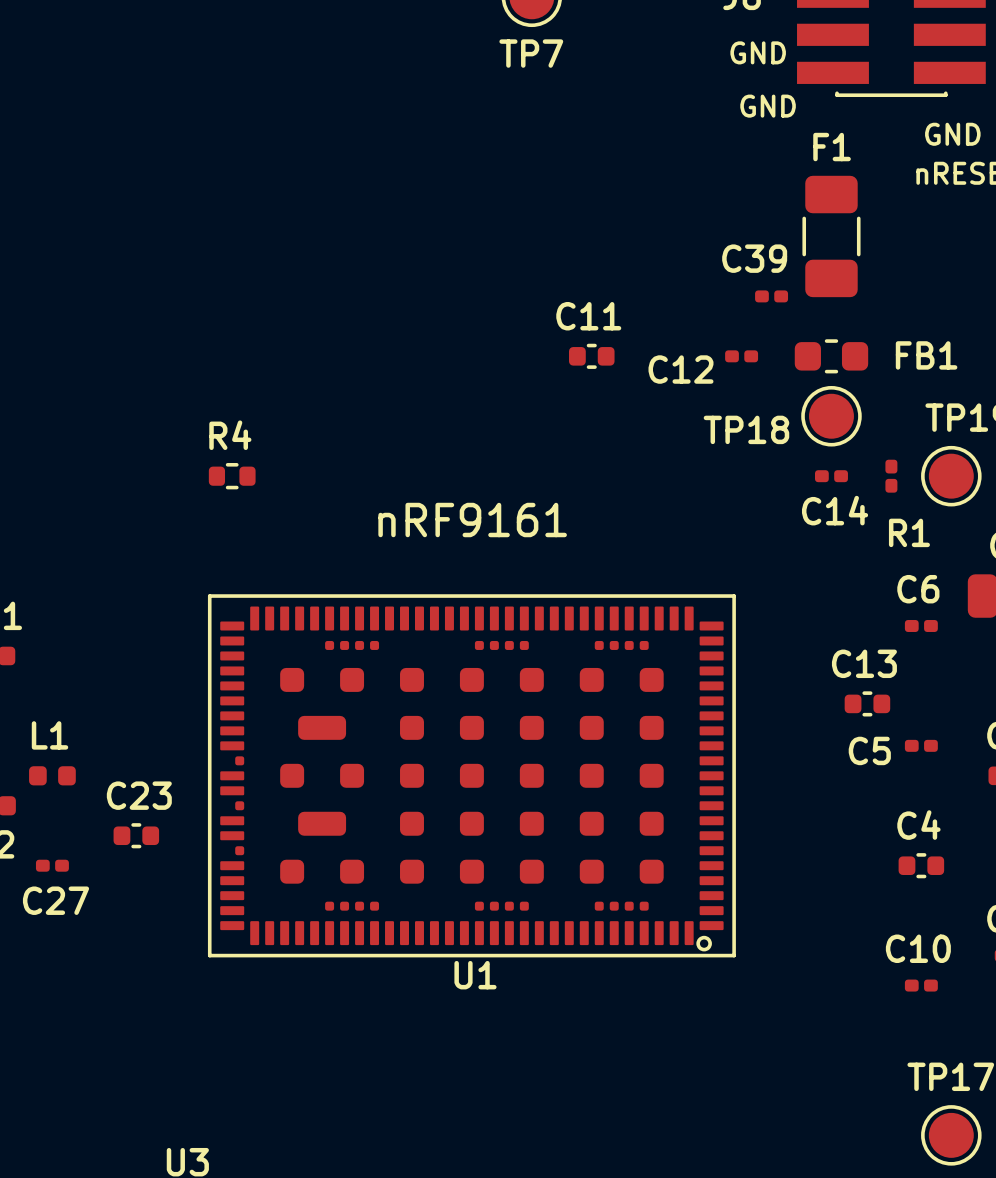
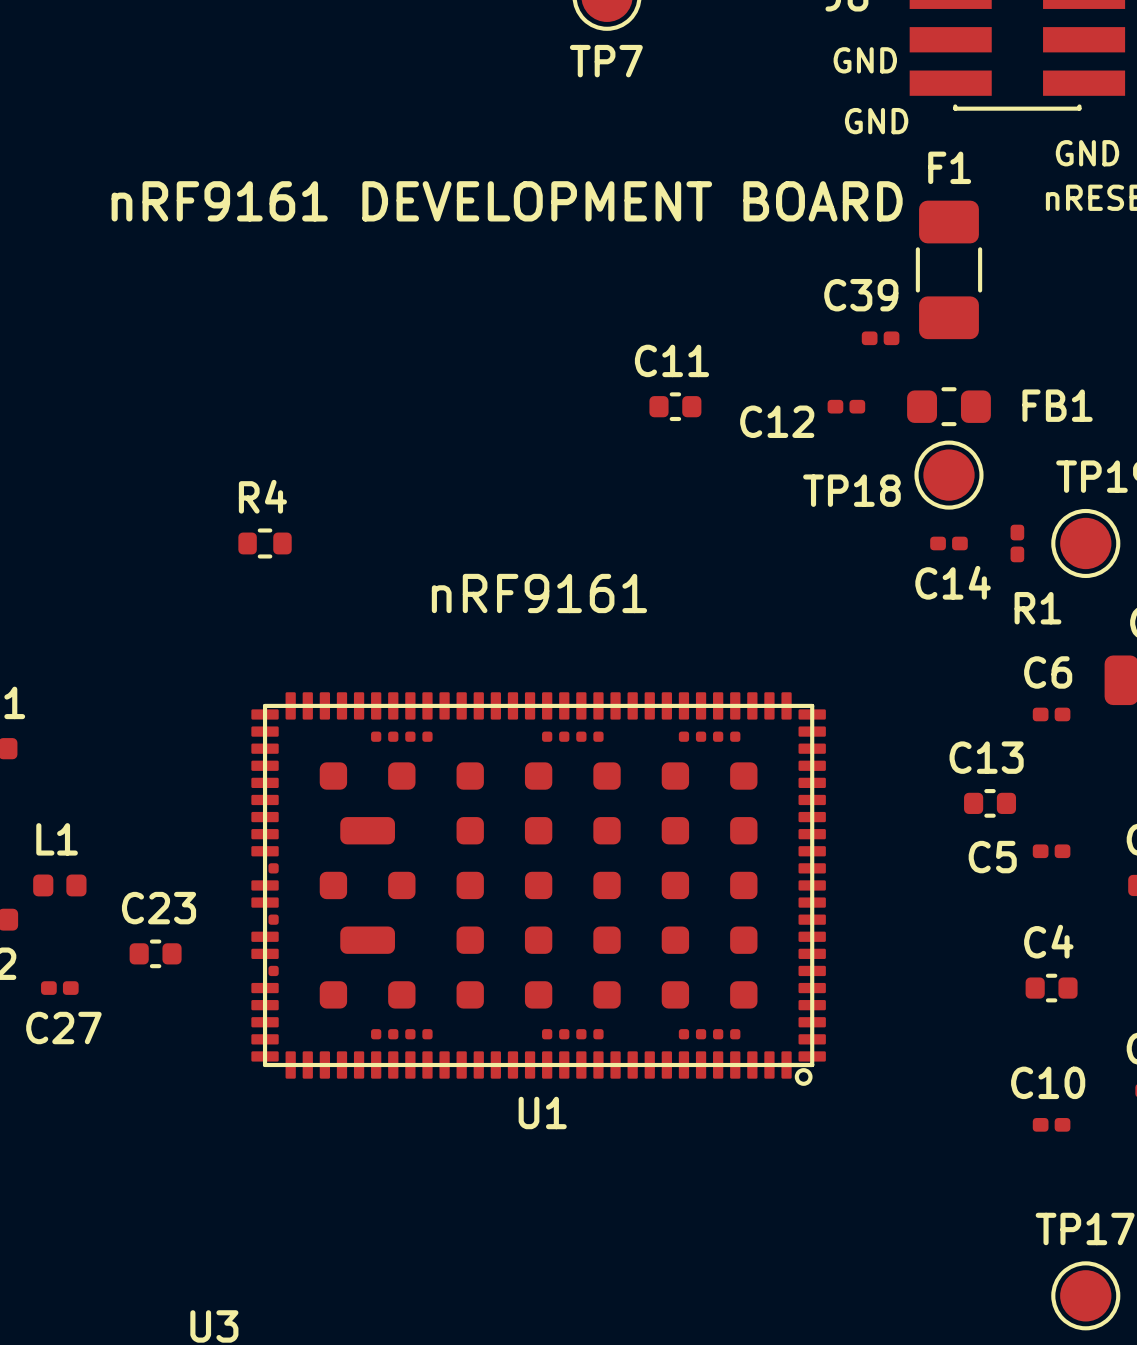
text: none -> nRF9161 DEVELOPMENT BOARD (507, 201)
U1 footprint: [207, 594, 736, 958] -> [251, 692, 826, 1086]

